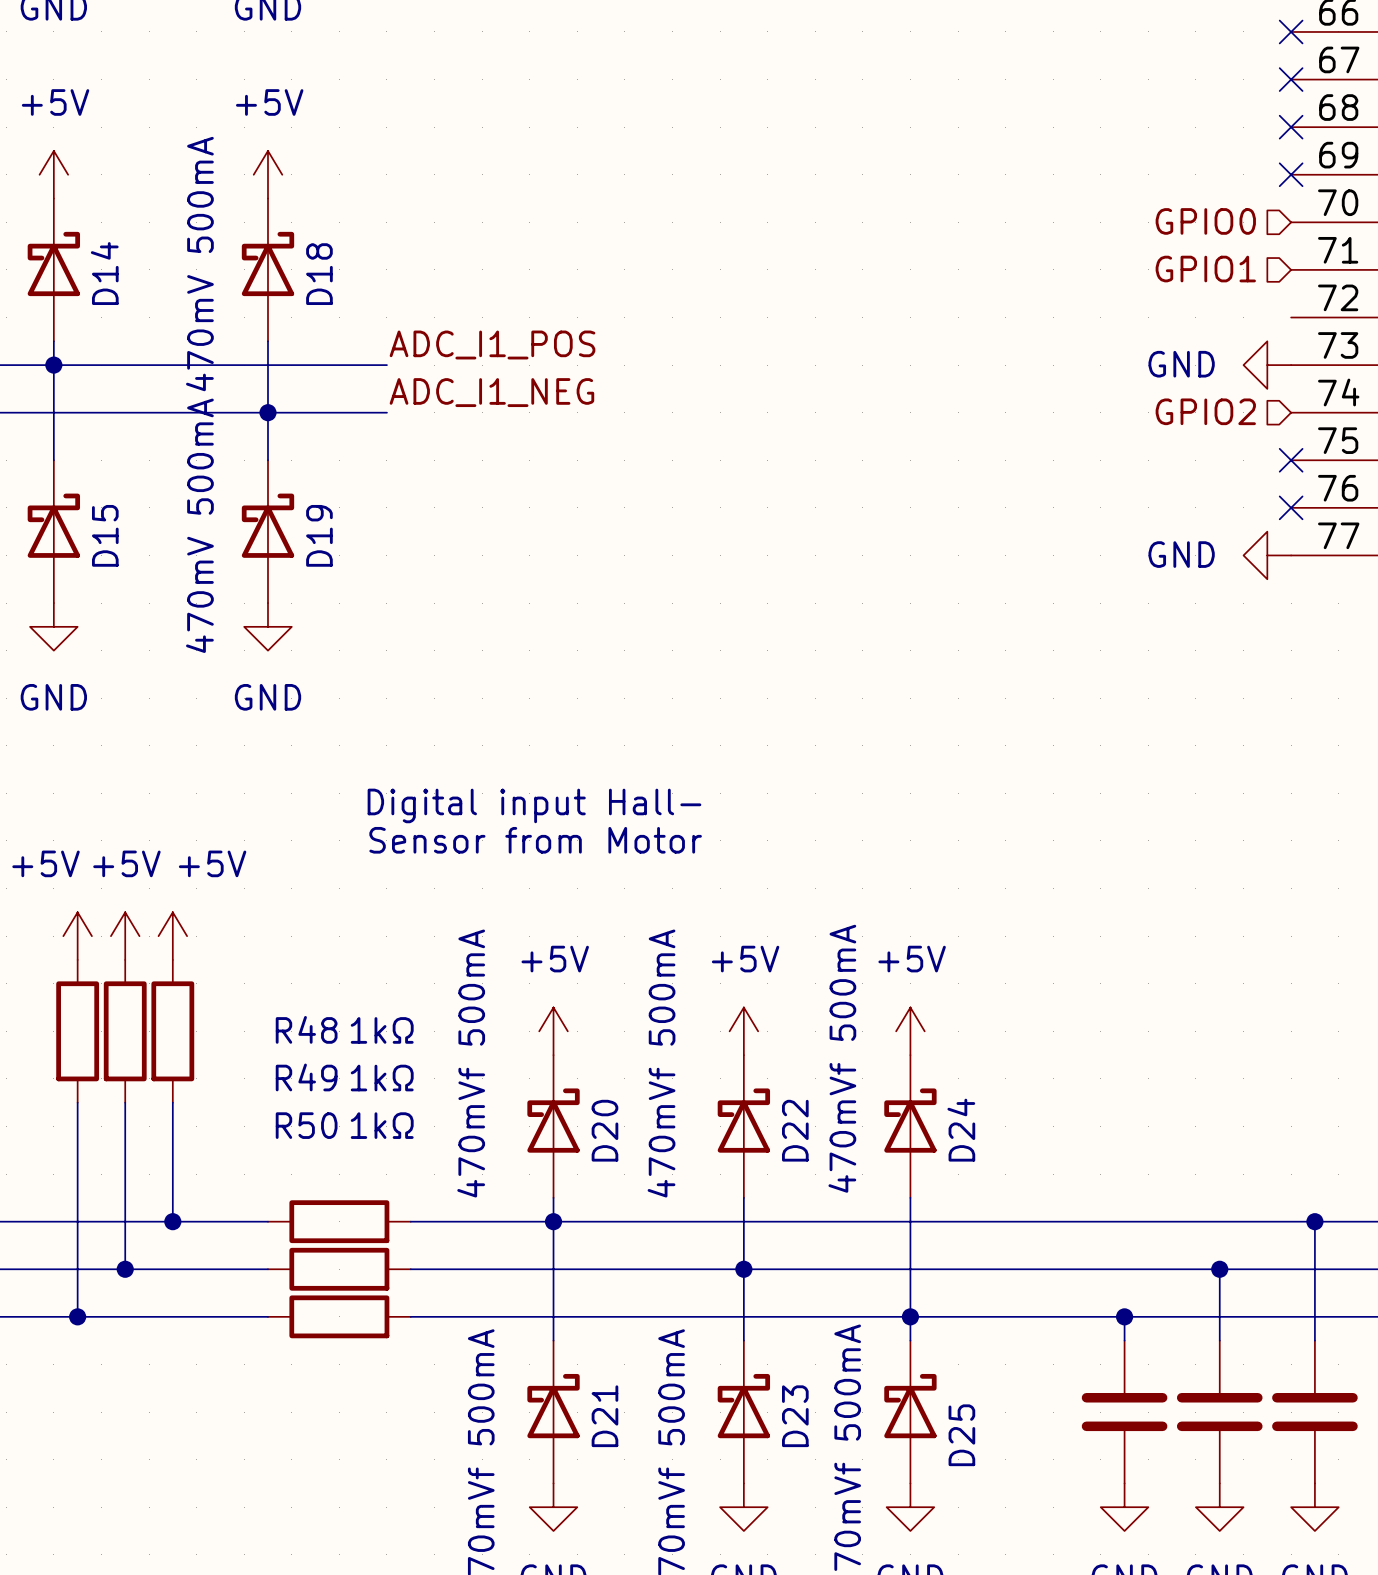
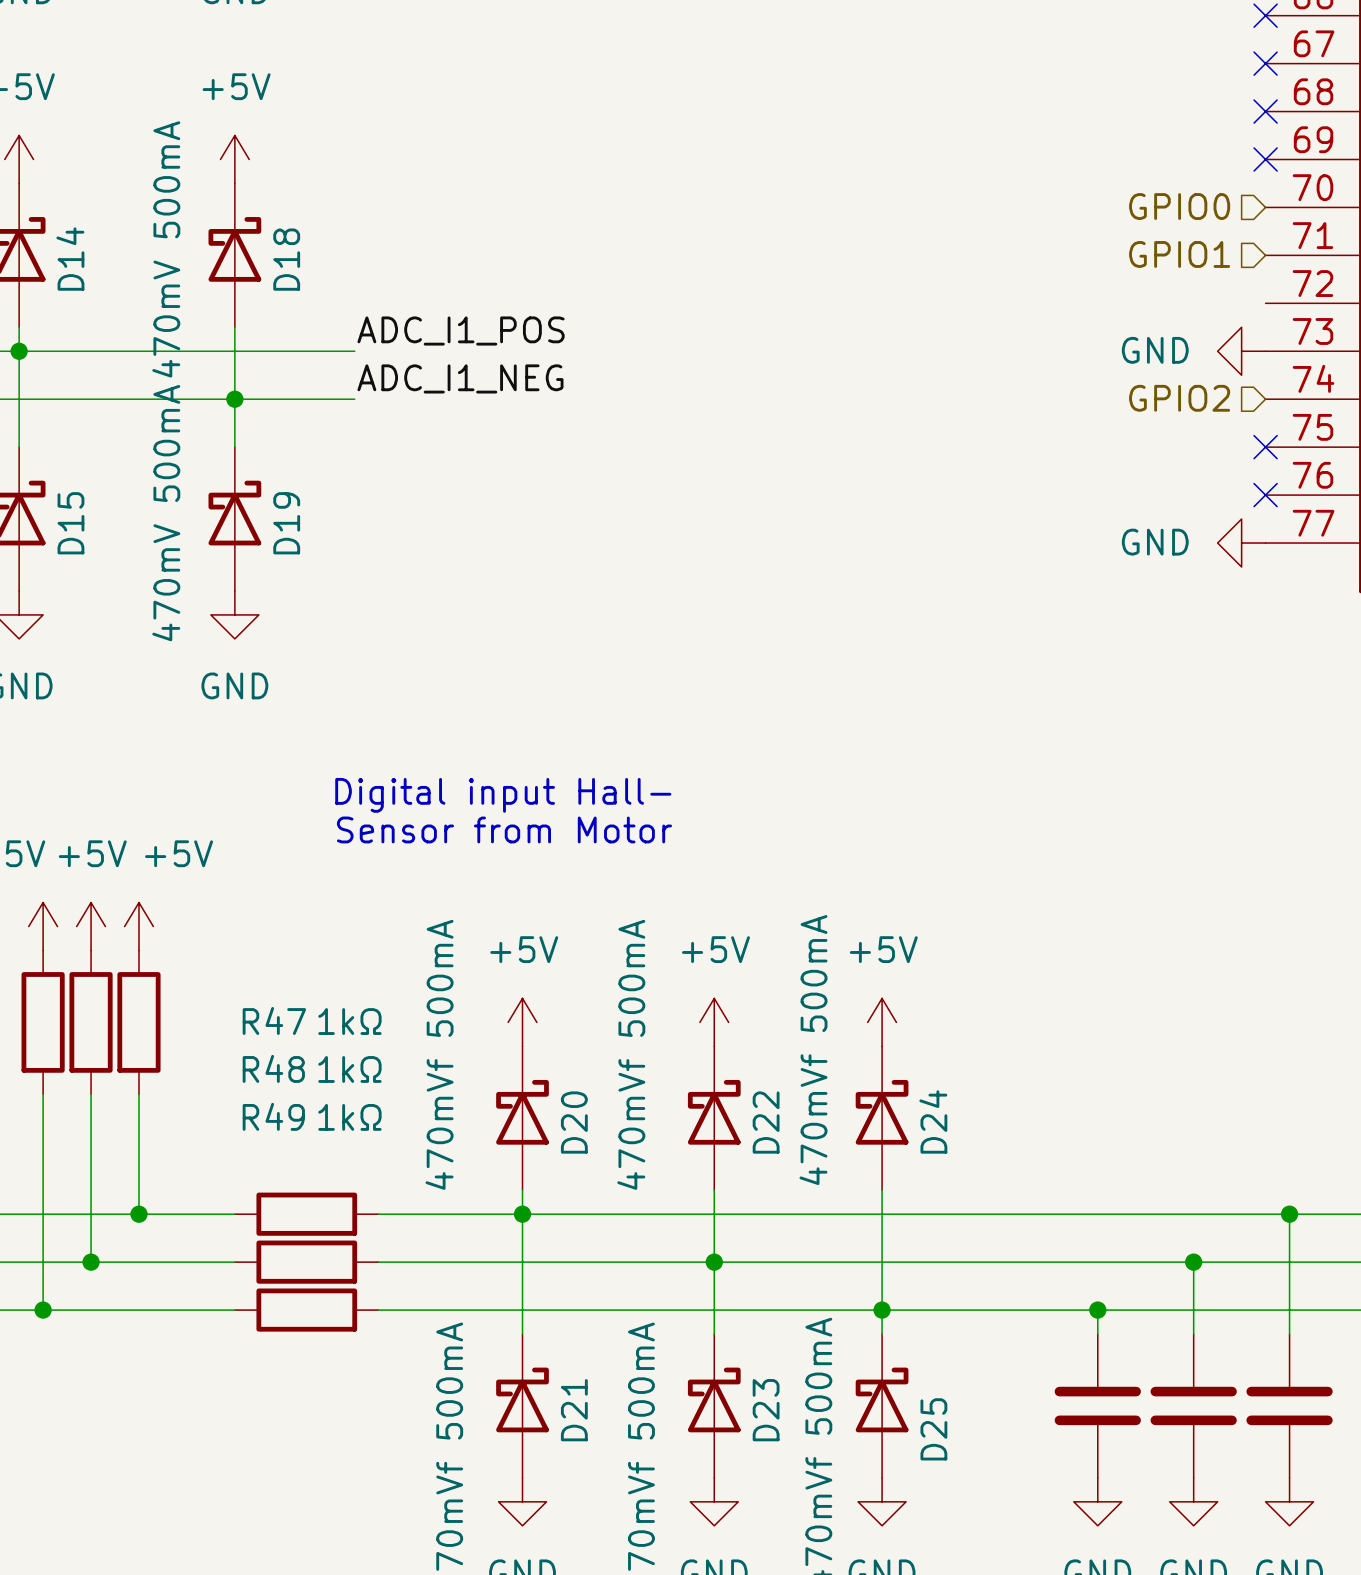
R48 name: R48 (306, 1029) -> R47 (274, 1020)
R49 name: R49 (306, 1077) -> R48 (273, 1068)
R50 name: R50 (306, 1125) -> R49 (273, 1116)

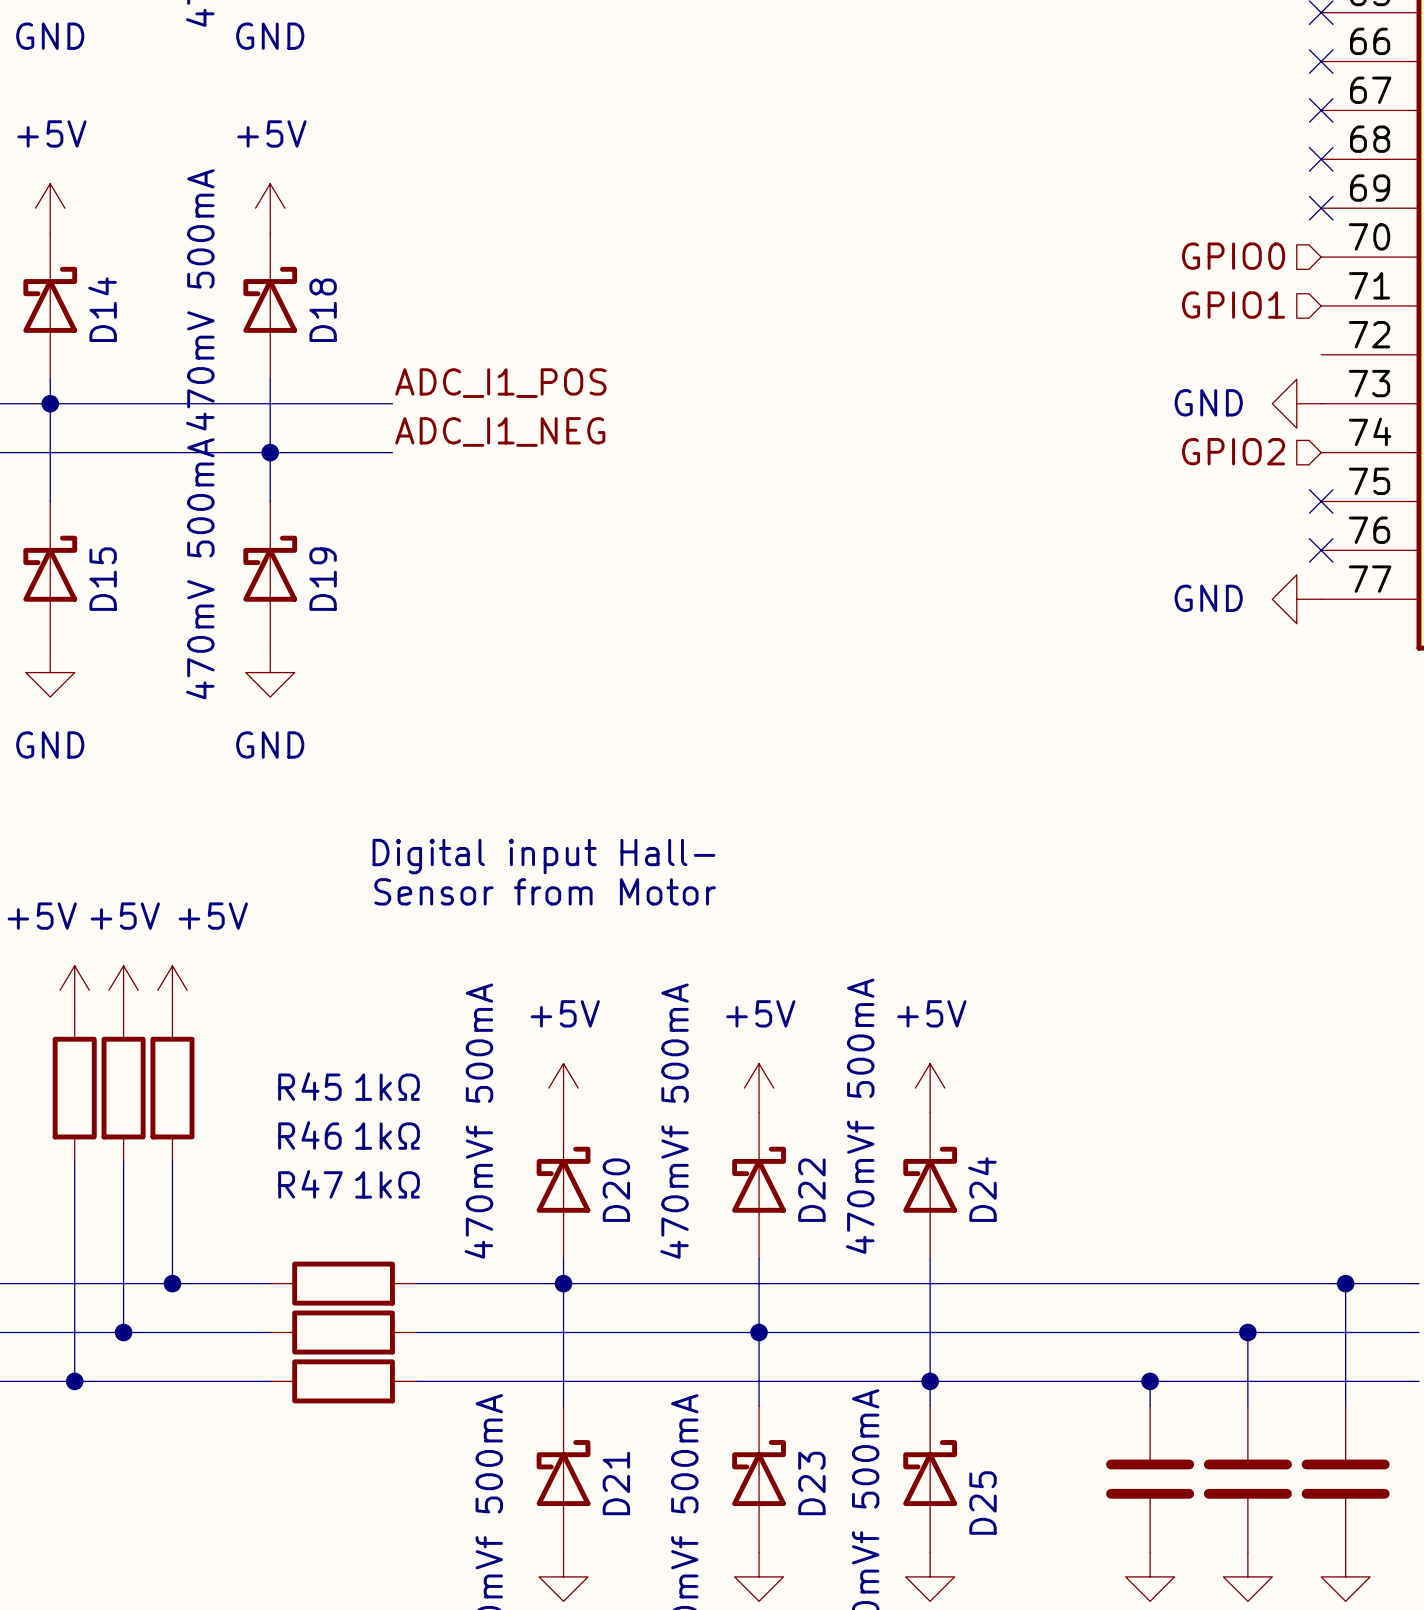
R47 name: R47 (274, 1020) -> R45 (309, 1086)
R48 name: R48 (273, 1068) -> R46 (309, 1135)
R49 name: R49 (273, 1116) -> R47 (310, 1184)

